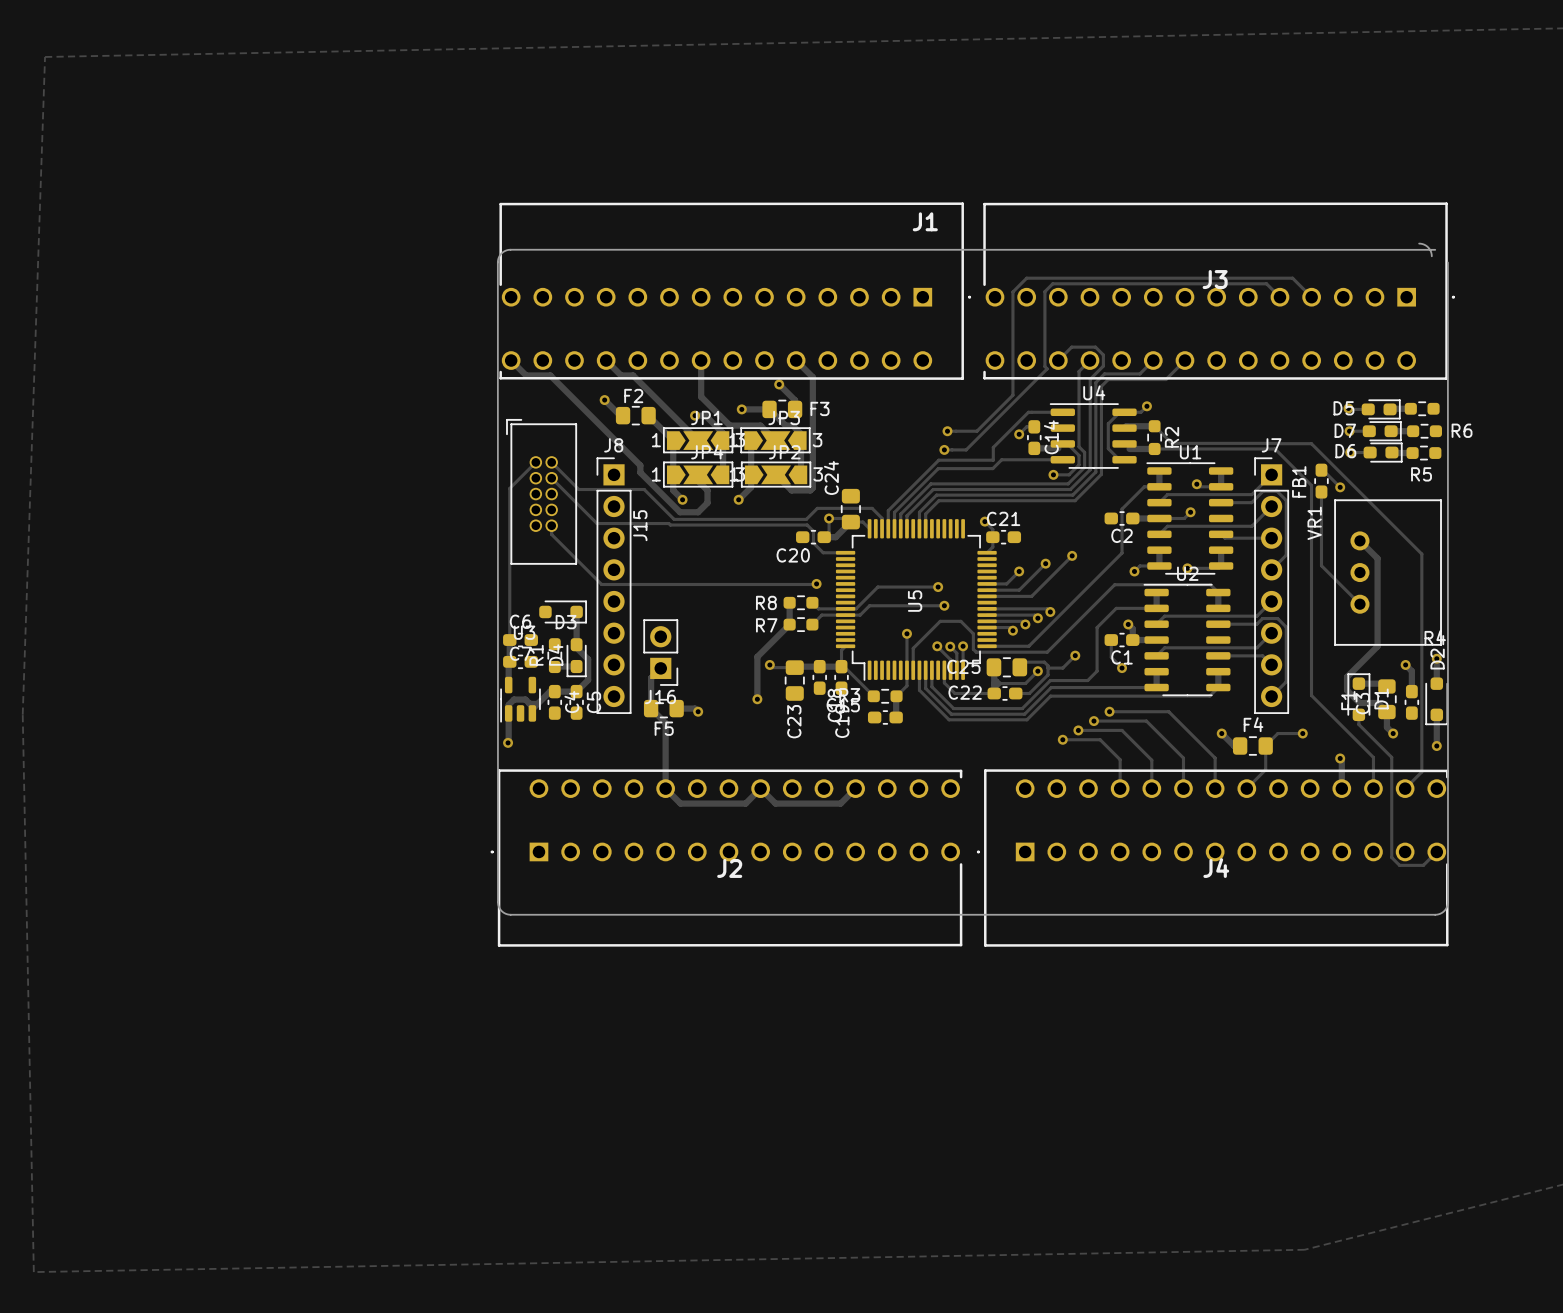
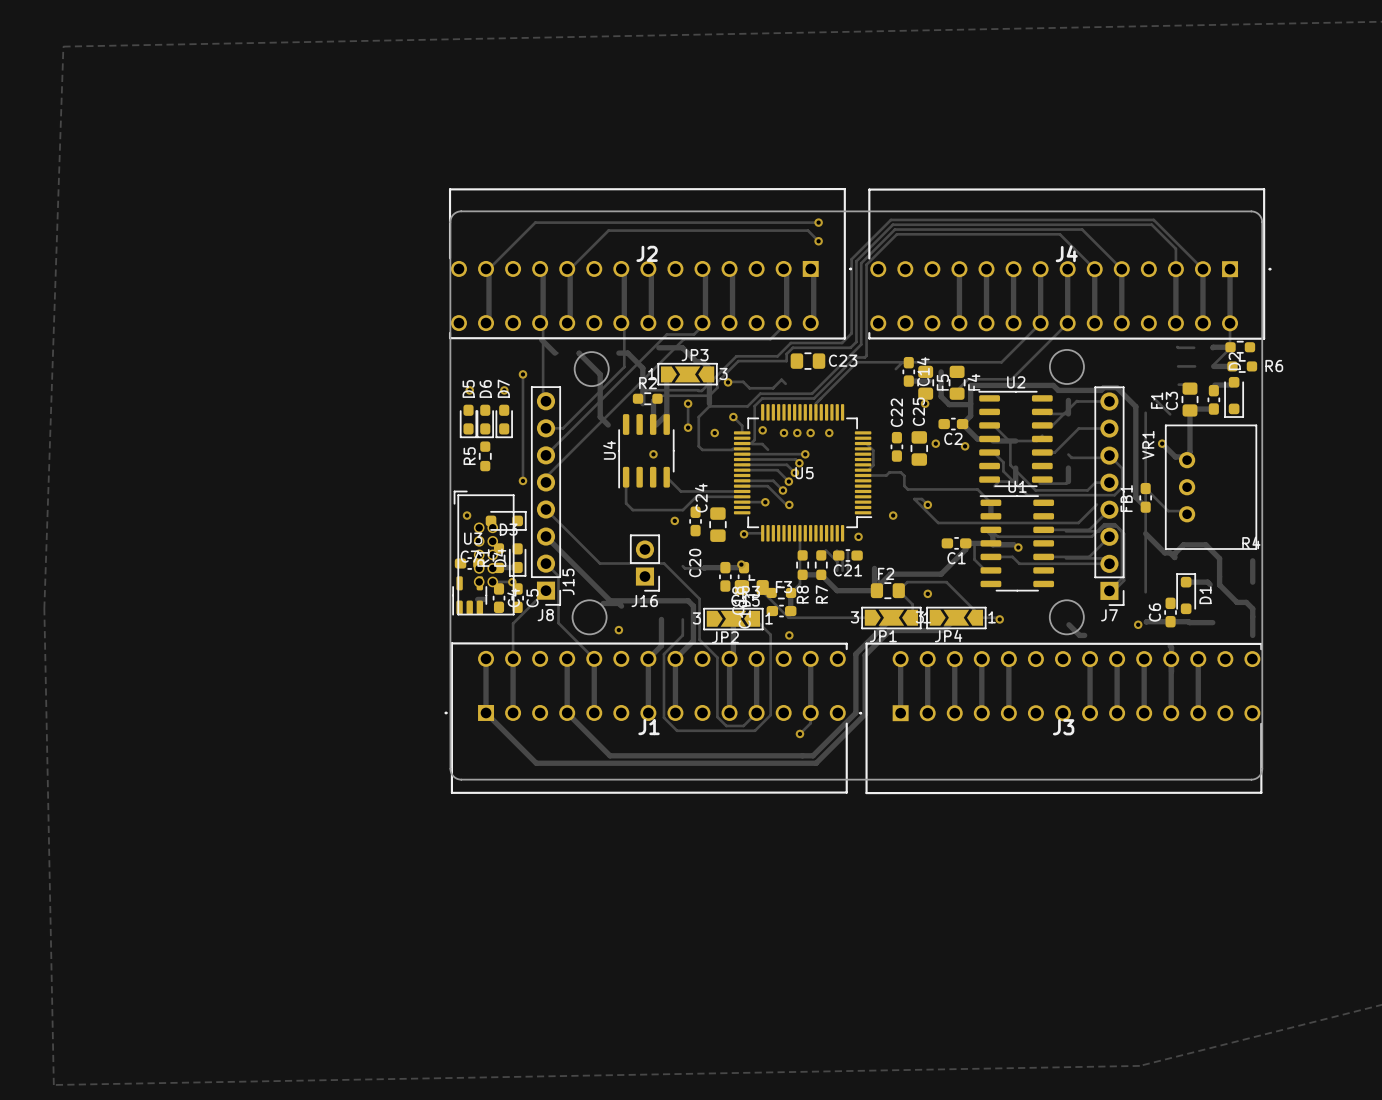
J1 name position: J1 (925, 221) -> J1 (649, 727)
board edge: (1419, 243) (1428, 247) (1431, 256) -> (1251, 211) (1259, 214) (1262, 222)
track: none -> (818, 222) (535, 222) (489, 268) (489, 323)
via: none -> (818, 222)
track: none -> (818, 241) (807, 230) (608, 230) (570, 268) (570, 323)
via: none -> (818, 241)
J1 rotation: 0° (735, 291) -> 180° (646, 718)
J1 position: (735, 291) -> (646, 718)
J3 rotation: 0° (1218, 291) -> 180° (1061, 718)
J3 position: (1218, 291) -> (1061, 718)
track: (1279, 297) (1266, 283) (1052, 283) (1044, 291) (1044, 366) (1047, 368) (966, 449) (944, 449) -> none
track: (1311, 297) (1292, 278) (1026, 278) (1012, 291) (1012, 395) (976, 431) (947, 431) -> none
track: none -> (543, 268) (543, 398) (546, 401)
track: none -> (624, 268) (624, 367) (563, 428) (546, 428)
track: none -> (651, 268) (651, 323)
track: none -> (705, 268) (705, 323) (694, 334) (666, 334) (546, 455)
track: none -> (732, 268) (732, 323)
track: none -> (786, 268) (786, 323) (770, 339) (683, 339) (546, 477) (546, 482)
track: none -> (813, 268) (813, 323)
track: none -> (959, 269) (959, 323)
track: none -> (986, 269) (986, 323)
track: none -> (1013, 269) (1013, 323)
track: none -> (1040, 269) (1040, 323) (1001, 362) (857, 362) (815, 403) (815, 412)
track: none -> (1067, 269) (1067, 323) (1011, 379) (968, 379) (957, 390) (957, 393)
track: none -> (1230, 269) (1230, 348) (1213, 364)
track: (511, 360) (526, 375) (550, 375) (640, 465) (640, 472) (680, 512) (698, 512) (707, 502) (707, 490) (698, 481) (698, 474) -> none
track: (606, 360) (621, 375) (633, 375) (698, 440) -> none
track: (701, 360) (701, 396) (729, 425) (760, 425) (775, 440) -> none
track: (796, 360) (812, 377) (812, 487) (810, 490) (791, 490) (776, 474) -> (688, 427) (688, 403)
track: (1058, 360) (1071, 347) (1095, 347) (1103, 354) (1103, 366) (1090, 379) (1090, 469) (1070, 489) (933, 489) (906, 515) (906, 528) -> none
track: (1089, 360) (1079, 371) (1079, 446) (1084, 452) (1084, 467) (1068, 483) (930, 483) (900, 514) (900, 528) -> none
track: (1153, 360) (1139, 373) (1104, 373) (1095, 382) (1095, 472) (1072, 495) (936, 495) (919, 512) (919, 528) -> none
track: (1184, 360) (1165, 379) (1108, 379) (1101, 386) (1101, 474) (1075, 500) (938, 500) (925, 513) (925, 528) -> none
track: none -> (1094, 323) (1094, 269) (1059, 234) (896, 234) (866, 264) (866, 355) (855, 357) (814, 398) (762, 398) (754, 406) (754, 439) (751, 443) (742, 443)
track: none -> (1121, 323) (1121, 269) (1082, 229) (894, 229) (861, 263) (861, 344) (812, 393) (760, 393) (747, 406) (709, 406) (698, 417) (698, 446) (702, 449) (742, 448)
track: none -> (1175, 323) (1175, 248) (1151, 224) (892, 224) (856, 261) (856, 341) (850, 347) (792, 347) (786, 354) (786, 361) (738, 361) (717, 382) (717, 387) (709, 395) (660, 395) (655, 398) (653, 401) (653, 424)
track: none -> (1202, 323) (1202, 269) (1153, 219) (890, 219) (851, 259) (851, 333) (842, 342) (790, 342) (777, 356) (736, 356) (701, 390) (646, 390) (638, 398)
track: (779, 384) (795, 400) (795, 409) -> none
via: (779, 384) -> none
via: (604, 400) -> none
track: (1146, 406) (1140, 412) (1119, 412) (1108, 423) (1108, 448) (1119, 459) (1124, 459) -> none
via: (1146, 406) -> none
via: (1348, 408) -> none
via: (741, 409) -> none
F3 position: (782, 409) -> (751, 587)
D5 rotation: 0° (1381, 409) -> 90° clockwise (468, 421)
D5 position: (1381, 409) -> (468, 421)
round board edge: none -> [1049, 349, 1085, 385]
track: (1062, 412) (1028, 412) (993, 447) (993, 460) (938, 460) (888, 510) (888, 528) -> none
round board edge: none -> [574, 351, 610, 387]
F2 position: (635, 415) -> (887, 590)
via: (695, 415) -> none
track: (1124, 428) (1126, 426) (1154, 426) (1171, 443) (1311, 443) (1421, 554) (1421, 771) (1405, 788) -> none
via: (947, 431) -> none
via: (1349, 431) -> none
D7 rotation: 0° (1382, 431) -> 90° clockwise (504, 421)
D7 position: (1382, 431) -> (504, 421)
via: (1019, 434) -> none
U4 rotation: 0° (1093, 436) -> 90° counterclockwise (646, 451)
U4 position: (1093, 436) -> (646, 451)
track: none -> (941, 371) (941, 396) (949, 404) (970, 403)
R2 rotation: 0° (1154, 437) -> 90° clockwise (647, 398)
R2 position: (1154, 437) -> (647, 398)
R2 name position: R2 (1172, 437) -> R2 (648, 383)
track: none -> (522, 374) (522, 480)
via: none -> (522, 374)
JP1 rotation: 0° (698, 440) -> 180° (891, 618)
JP1 position: (698, 440) -> (891, 618)
track: (1062, 443) (1067, 443) (1079, 455) (1079, 464) (1069, 474) (1053, 474) -> none
track: (1129, 448) (1275, 448) (1311, 485) -> none
track: none -> (728, 382) (743, 381) (749, 388) (773, 388) (781, 379) (785, 383)
via: none -> (728, 382)
via: (944, 449) -> none
via: (1350, 452) -> none
D6 rotation: 0° (1383, 452) -> 90° clockwise (485, 421)
D6 position: (1383, 452) -> (485, 421)
R5 rotation: 0° (1423, 453) -> 90° clockwise (485, 456)
R5 position: (1423, 453) -> (485, 456)
via: none -> (469, 390)
via: none -> (504, 390)
track: (1062, 459) (1001, 459) (992, 468) (938, 468) (894, 512) (894, 528) -> none
track: (534, 462) (509, 488) (508, 685) -> none
track: (551, 462) (578, 489) (644, 489) (674, 519) (806, 519) (817, 508) (872, 508) (882, 518) (882, 528) -> none
track: (1159, 470) (1159, 486) (1144, 486) (1122, 509) (1122, 553) (1028, 646) (987, 646) -> none
track: none -> (1109, 401) (1076, 401) (1052, 425) (1042, 425)
JP4 rotation: 0° (698, 474) -> 180° (956, 618)
JP4 position: (698, 474) -> (956, 618)
JP2 rotation: 0° (776, 474) -> 180° (733, 619)
JP2 position: (776, 474) -> (733, 619)
via: none -> (688, 403)
track: (1271, 474) (1251, 494) (1167, 494) (1159, 502) -> none
track: (551, 478) (597, 523) (807, 525) (813, 531) (813, 543) (823, 552) (845, 552) -> none
FB1 position: (1321, 481) -> (1145, 497)
track: none -> (1213, 409) (1190, 410) (1190, 452) (1185, 456) (1175, 456) (1162, 443)
via: (1196, 484) -> none
via position: (1340, 487) -> (1162, 443)
track: none -> (733, 417) (742, 425) (742, 432)
via: none -> (733, 417)
J15 position: (541, 491) -> (484, 553)
track: (1321, 491) (1321, 565) (1359, 604) -> none
via: (682, 499) -> none
via: (738, 499) -> none
track: none -> (993, 425) (1010, 442) (1010, 465) (1035, 490) (1087, 490) (1095, 482) (1109, 482)
via: none -> (688, 427)
track: (1221, 502) (1251, 502) (1263, 491) (1277, 491) (1286, 500) (1286, 555) (1271, 569) -> none
track: none -> (1109, 428) (1078, 428) (1054, 452) (1042, 452)
via: none -> (762, 430)
track: (1271, 506) (1251, 526) (1167, 526) (1159, 534) -> none
via: none -> (714, 433)
C24 position: (850, 509) -> (717, 524)
via: none -> (783, 433)
via: none -> (797, 433)
via: none -> (810, 433)
via: none -> (829, 433)
via: (1190, 512) -> none
track: none -> (989, 438) (977, 438) (962, 424) (970, 415) (970, 385) (1053, 385) (1058, 390) (1100, 390) (1103, 387) (1116, 387) (1135, 406) (1135, 497) (1145, 507)
track: (829, 518) (847, 518) (850, 522) (835, 537) (824, 537) (829, 532) (829, 518) -> none
via: (829, 518) -> none
C21 name position: C21 (1003, 518) -> C21 (847, 570)
C2 position: (1122, 518) -> (953, 424)
U1 position: (1189, 518) -> (1016, 543)
via: (984, 521) -> none
via: none -> (935, 443)
via: none -> (965, 446)
track: (551, 525) (551, 534) (601, 584) (816, 583) -> none
track: none -> (989, 452) (993, 452) (1003, 462) (1003, 471) (1027, 495) (1114, 495) (1122, 487) (1122, 468) (1109, 455)
track: none -> (742, 454) (805, 454)
via: none -> (653, 454)
via: none -> (805, 454)
C20 rotation: 0° (813, 537) -> 90° clockwise (695, 521)
C20 position: (813, 537) -> (695, 521)
C21 position: (1003, 537) -> (847, 555)
track: none -> (742, 459) (795, 459) (799, 463)
track: (1359, 540) (1377, 558) (1377, 646) (1347, 676) (1347, 690) (1359, 702) (1377, 702) (1386, 712) (1386, 727) (1393, 733) -> none
via: none -> (799, 463)
track: none -> (742, 464) (786, 464) (794, 472)
track: none -> (742, 470) (777, 470) (788, 481)
C20 name position: C20 (793, 555) -> C20 (695, 562)
via: none -> (794, 472)
track: (1072, 555) (1031, 596) (987, 596) -> none
via: (1072, 555) -> none
track: none -> (863, 475) (886, 475) (889, 472) (900, 472) (904, 475) (904, 485) (907, 489) (977, 489) (990, 502) (990, 516)
track: none -> (626, 477) (626, 503) (632, 510) (682, 510) (696, 496) (742, 496)
track: none -> (666, 477) (680, 491) (742, 491)
track: (1045, 563) (1019, 590) (987, 590) -> none
via: (1045, 563) -> none
via: none -> (522, 480)
track: none -> (742, 480) (773, 480) (782, 490)
via: none -> (788, 481)
via: (1187, 568) -> none
track: none -> (742, 486) (767, 486) (786, 504) (789, 504)
track: (1019, 571) (1006, 583) (987, 583) -> none
via: (1019, 571) -> none
via: (1134, 571) -> none
track: none -> (1145, 488) (1168, 511) (1185, 511)
via: none -> (782, 490)
via: (816, 583) -> none
J8 rotation: 0° (614, 585) -> 180° (546, 495)
J7 rotation: 0° (1271, 585) -> 180° (1109, 496)
track: (938, 587) (877, 587) (856, 608) (818, 608) (812, 602) -> none
via: (938, 587) -> none
track: none -> (742, 502) (765, 502)
via: none -> (765, 502)
track: (1156, 592) (1156, 608) (1116, 608) (1097, 627) (1097, 671) (1087, 680) (1050, 680) (1022, 708) (953, 708) (931, 686) (931, 670) -> none
track: none -> (1096, 504) (1078, 522) (938, 522) (914, 499) (921, 499) (927, 504)
via: none -> (789, 504)
via: none -> (927, 504)
track: none -> (546, 509) (600, 563) (664, 563) (699, 598) (699, 639) (717, 657) (717, 717) (726, 725) (743, 725) (756, 712) (756, 658)
track: none -> (1109, 509) (1089, 529) (1043, 529)
U5 rotation: 0° (916, 599) -> 90° counterclockwise (802, 472)
track: (1271, 601) (1256, 616) (1164, 616) (1156, 624) -> none
R8 name position: R8 (766, 602) -> R8 (802, 594)
track: (789, 602) (789, 624) (757, 656) (757, 699) -> none
R8 rotation: 0° (801, 602) -> 90° clockwise (802, 565)
R8 position: (801, 602) -> (802, 565)
via: none -> (467, 515)
track: (944, 605) (869, 605) (860, 615) (821, 615) (812, 624) -> none
via: (944, 605) -> none
via: none -> (893, 515)
track: (987, 608) (1047, 608) (1050, 611) -> none
track: (1218, 608) (1218, 592) (1210, 584) (1114, 584) (1047, 652) (976, 652) (973, 649) (973, 633) (960, 621) (940, 621) (913, 648) (913, 670) -> none
track: (576, 611) (576, 647) (588, 659) (588, 680) (576, 691) (549, 691) (532, 709) -> none
via: none -> (674, 520)
via: (1050, 611) -> none
track: (987, 615) (1034, 615) (1037, 618) -> none
via: (1037, 618) -> none
C6 name position: C6 (520, 621) -> C6 (1154, 612)
track: (987, 621) (1022, 621) (1025, 624) -> none
track: none -> (990, 529) (997, 536) (1091, 536) (1104, 524) (1114, 524) (1121, 531) (1121, 578) (1109, 590)
R7 rotation: 0° (801, 624) -> 90° clockwise (821, 565)
R7 position: (801, 624) -> (821, 565)
via: (1025, 624) -> none
via: (1128, 624) -> none
R7 name position: R7 (766, 625) -> R7 (821, 594)
track: none -> (762, 533) (744, 534)
track: none -> (1145, 533) (1164, 552) (1170, 552) (1174, 557) (1174, 553) (1183, 544) (1205, 544) (1219, 558) (1219, 584) (1237, 602) (1246, 602) (1252, 608)
via: none -> (744, 534)
track: (987, 627) (1009, 627) (1012, 630) -> none
track: none -> (546, 536) (610, 600) (688, 600) (693, 606) (693, 640) (675, 658) (675, 712)
via: none -> (858, 536)
via: (1012, 630) -> none
track: none -> (1109, 536) (1089, 556) (1043, 556)
via: (906, 633) -> none
track: (1271, 633) (1256, 647) (1164, 647) (1156, 655) -> none
C6 rotation: 0° (520, 640) -> 90° clockwise (1170, 612)
C6 position: (520, 640) -> (1170, 612)
C1 position: (1122, 640) -> (956, 543)
U2 position: (1187, 640) -> (1015, 438)
track: none -> (1018, 547) (1014, 543) (965, 543) (965, 549) (941, 574) (890, 574) (876, 587) (876, 590) (837, 590) (821, 574) (802, 574)
via: none -> (1018, 547)
track: (845, 646) (841, 650) (841, 666) (844, 666) (873, 696) -> none
via: (937, 646) -> none
via: (950, 646) -> none
via: (963, 646) -> none
J16 position: (660, 652) -> (644, 563)
track: none -> (990, 556) (1012, 556) (1019, 563) (1109, 563)
track: (1075, 655) (1062, 668) (1048, 668) -> none
via: (1075, 655) -> none
via: (1436, 658) -> none
track: none -> (546, 563) (558, 576) (558, 623) (594, 658) (594, 712)
via: none -> (741, 564)
via: (769, 664) -> none
track: (1405, 664) (1411, 671) (1411, 691) -> none
via: (1405, 664) -> none
C25 rotation: 0° (1006, 667) -> 90° clockwise (919, 448)
C25 position: (1006, 667) -> (919, 448)
track: (1019, 667) (1024, 662) (1044, 662) (1048, 665) (1048, 674) (1029, 693) (1015, 693) -> none
track: (660, 668) (651, 678) (651, 708) (665, 723) (665, 788) (680, 803) (745, 803) (760, 788) (775, 803) (840, 803) (855, 788) -> none
via: (1122, 668) -> none
track: (919, 670) (919, 690) (949, 719) (1026, 719) (1050, 696) (1209, 696) (1218, 687) (1218, 671) -> none
track: (925, 670) (925, 688) (951, 714) (1024, 714) (1051, 687) (1156, 687) (1156, 671) -> none
track: (944, 670) (944, 682) (954, 693) (994, 693) -> none
track: (1037, 671) (1025, 683) (994, 683) -> none
via: (1037, 671) -> none
C23 rotation: 0° (794, 680) -> 90° clockwise (807, 361)
C23 position: (794, 680) -> (807, 361)
track: none -> (492, 581) (512, 582)
via: none -> (512, 582)
track: none -> (546, 590) (513, 623) (513, 712)
C22 rotation: 0° (1004, 693) -> 90° clockwise (896, 446)
C22 position: (1004, 693) -> (896, 446)
track: none -> (762, 591) (788, 617) (870, 617)
track: (1311, 695) (1373, 757) (1373, 788) -> none
via: none -> (927, 593)
via: (757, 699) -> none
F1 position: (1386, 699) -> (1190, 399)
D2 position: (1436, 701) -> (1234, 397)
C3 position: (1411, 702) -> (1213, 399)
round board edge: none -> [571, 599, 608, 635]
round board edge: none -> [1049, 599, 1085, 635]
F5 rotation: 0° (663, 708) -> 90° clockwise (925, 382)
F5 position: (663, 708) -> (925, 382)
via position: (698, 711) -> (618, 630)
track: (1109, 711) (1168, 711) (1215, 758) (1215, 788) -> none
via: (1109, 711) -> none
track: (532, 713) (532, 706) (525, 699) (513, 699) (508, 704) (508, 742) -> none
track: (1358, 714) (1358, 724) (1391, 757) (1391, 857) (1399, 865) (1423, 865) (1436, 851) -> none
C23 name position: C23 (794, 721) -> C23 (843, 360)
track: (1093, 721) (1146, 721) (1183, 758) (1183, 788) -> none
via: (1093, 721) -> none
track: none -> (891, 617) (855, 654) (855, 712) (813, 755) (610, 755) (567, 712) (567, 658)
track: none -> (912, 617) (912, 604) (898, 590) (907, 582) (946, 582) (977, 613) (977, 617) (998, 617) (999, 619)
track: none -> (956, 617) (943, 630) (889, 630) (865, 655) (865, 714) (816, 763) (536, 763) (486, 712) (486, 658)
track: none -> (733, 618) (733, 655) (729, 658) (729, 712)
track: none -> (754, 618) (770, 634) (770, 715) (755, 730) (677, 730) (663, 717) (663, 654) (682, 635) (682, 619)
track: none -> (661, 619) (661, 645) (648, 658) (648, 712)
via: none -> (999, 619)
F5 name position: F5 (664, 728) -> F5 (942, 382)
track: (1078, 730) (1122, 730) (1151, 760) (1151, 788) -> none
via: (1078, 730) -> none
track: none -> (1146, 622) (1212, 622)
via: (1221, 733) -> none
track: (1302, 733) (1277, 733) (1265, 745) (1265, 769) (1246, 788) -> none
via: (1393, 733) -> none
track: (1062, 739) (1100, 739) (1120, 759) (1120, 788) -> none
via: (1062, 739) -> none
via: (508, 742) -> none
via: none -> (789, 635)
F4 rotation: 0° (1252, 746) -> 90° clockwise (957, 382)
F4 position: (1252, 746) -> (957, 382)
via: (1436, 746) -> none
via: (1340, 758) -> none
track: none -> (810, 658) (810, 723) (799, 733)
track: none -> (900, 659) (900, 713)
track: none -> (927, 659) (927, 713)
track: none -> (954, 659) (954, 713)
track: none -> (981, 659) (981, 713)
track: none -> (1008, 659) (1008, 713)
track: none -> (1090, 659) (1090, 713)
track: none -> (1117, 659) (1117, 713)
track: none -> (1144, 659) (1144, 713)
track: none -> (1171, 659) (1171, 713)
track: none -> (1198, 659) (1198, 713)
J2 rotation: 0° (726, 858) -> 180° (650, 263)
J2 position: (726, 858) -> (650, 263)
J4 rotation: 0° (1212, 858) -> 180° (1069, 264)
J4 position: (1212, 858) -> (1069, 264)
via: none -> (799, 733)

